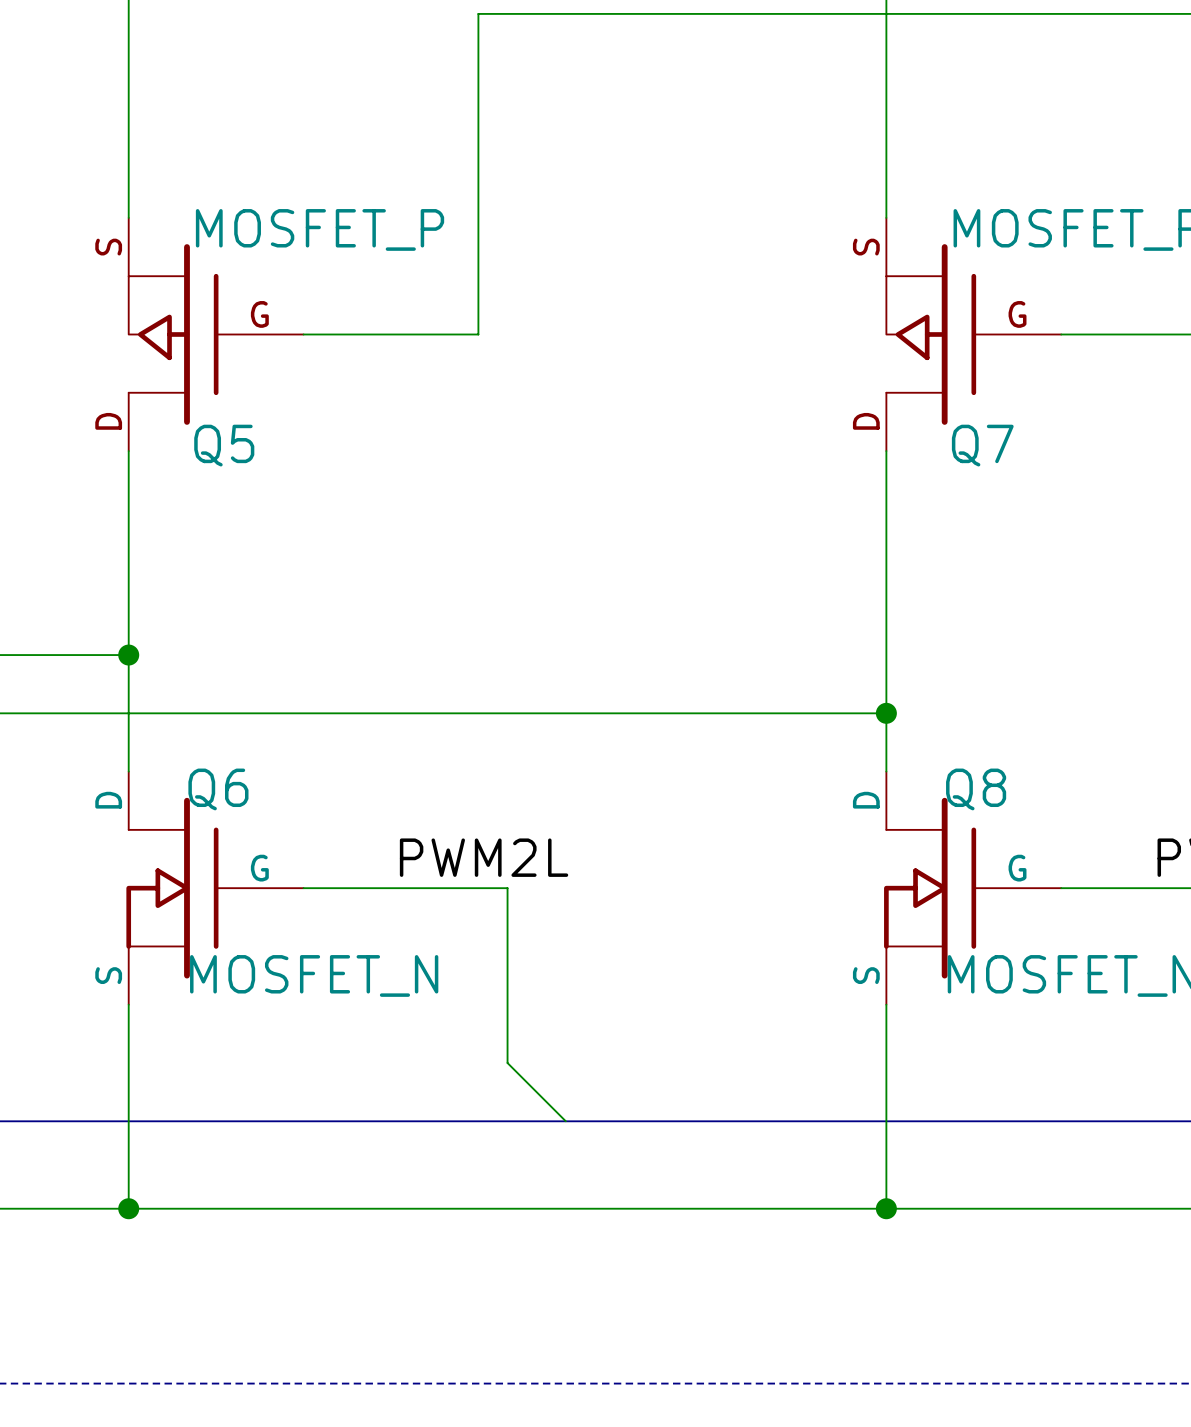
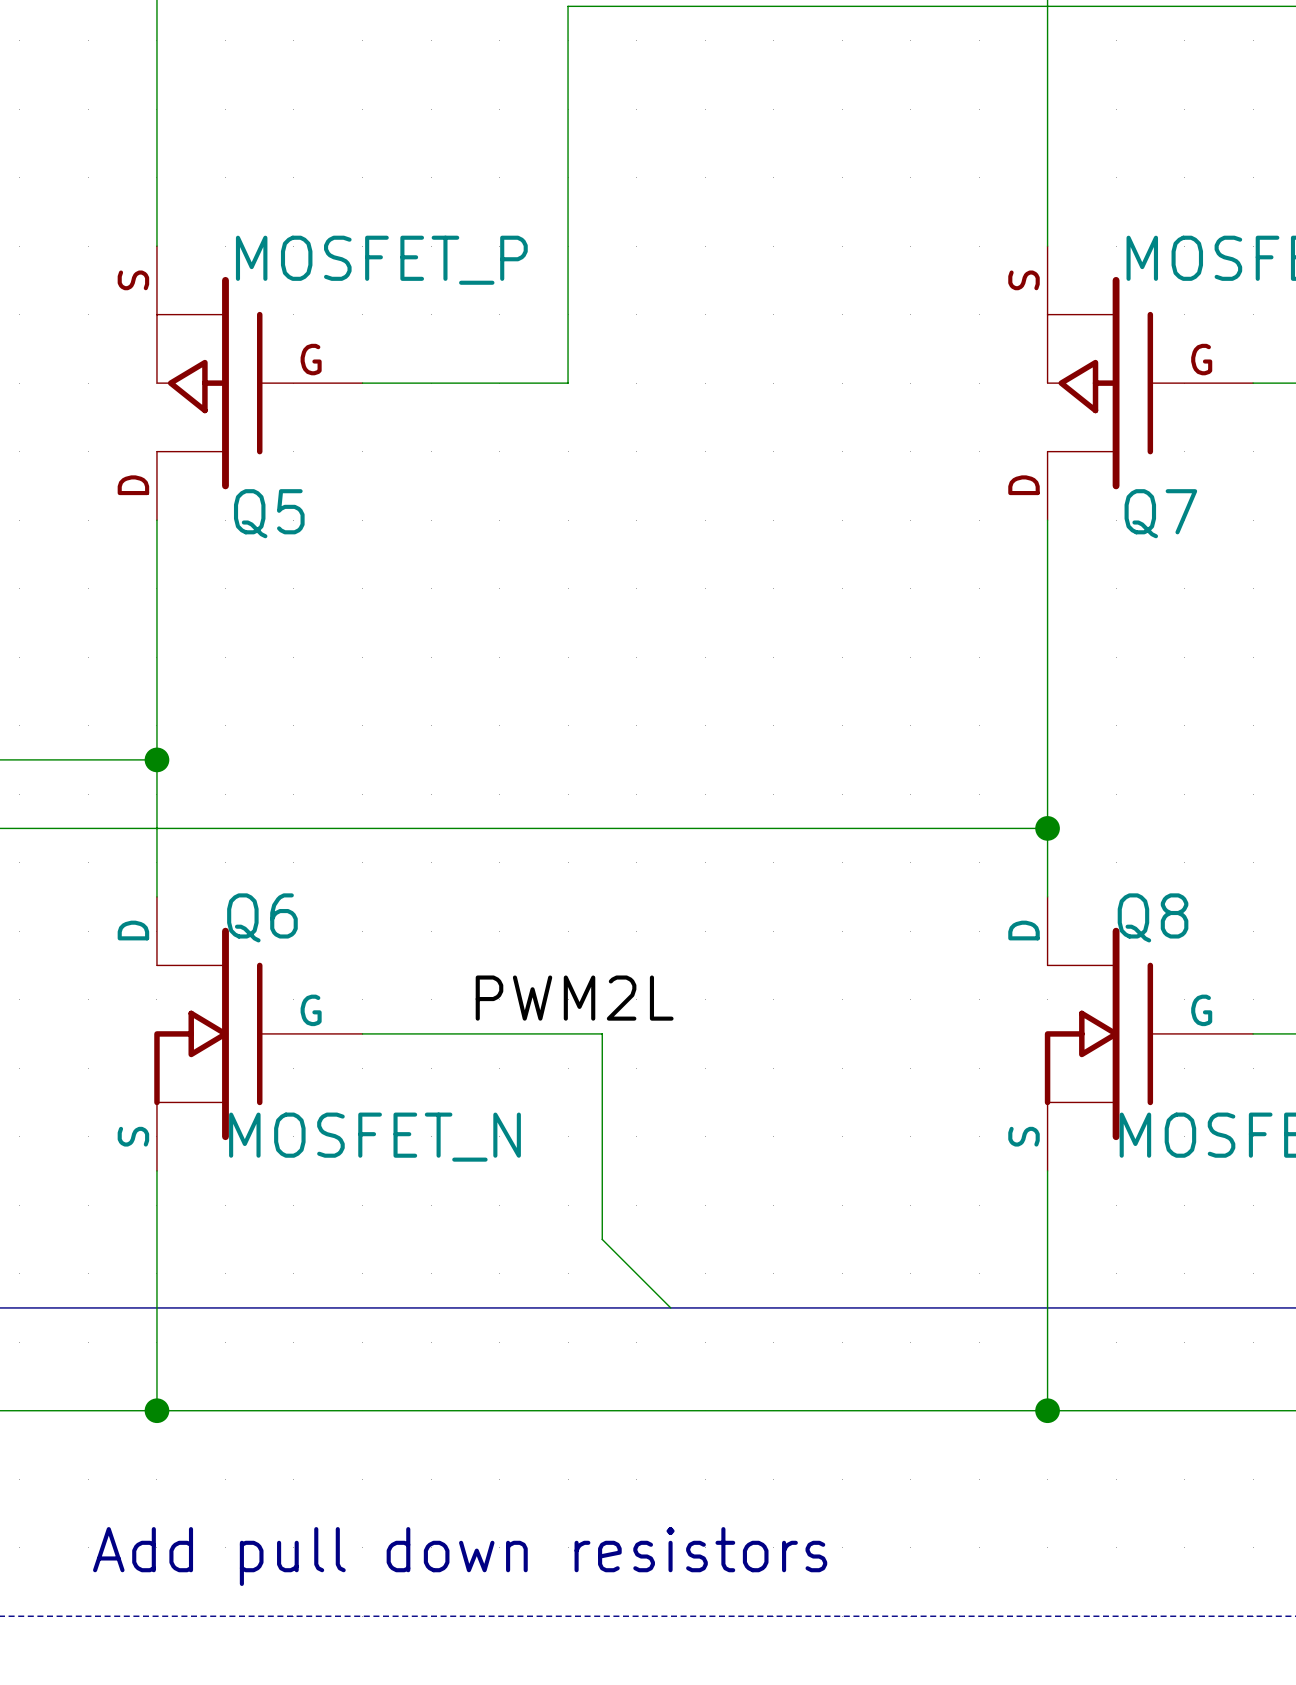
text: none -> Add pull down resistors (460, 1556)

